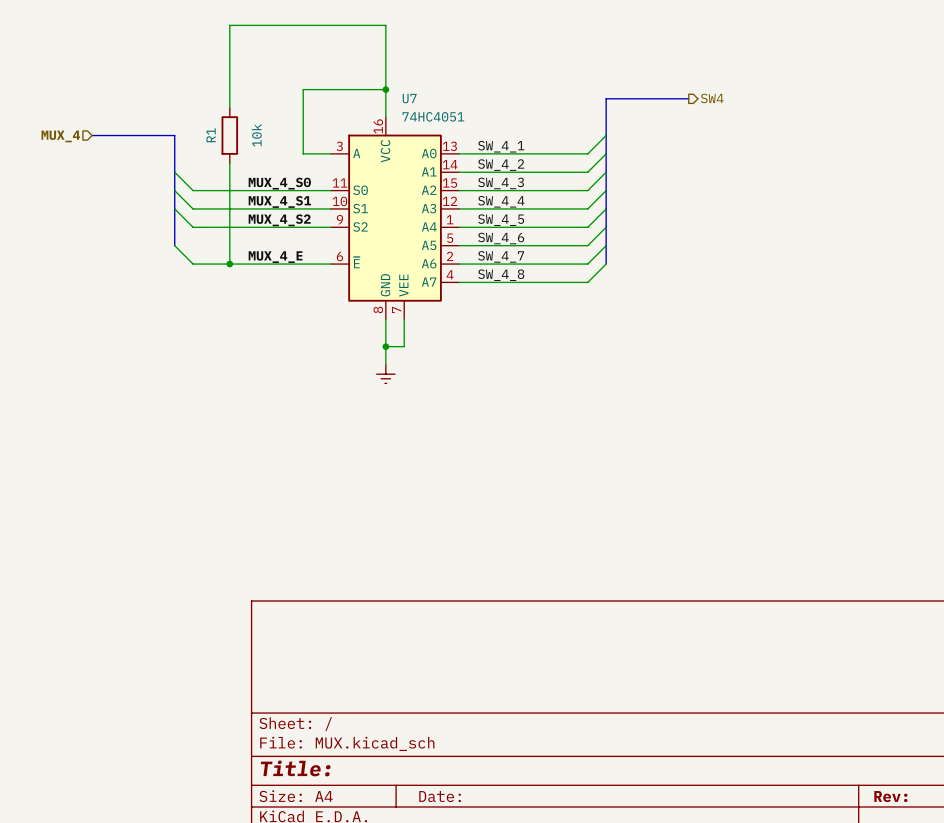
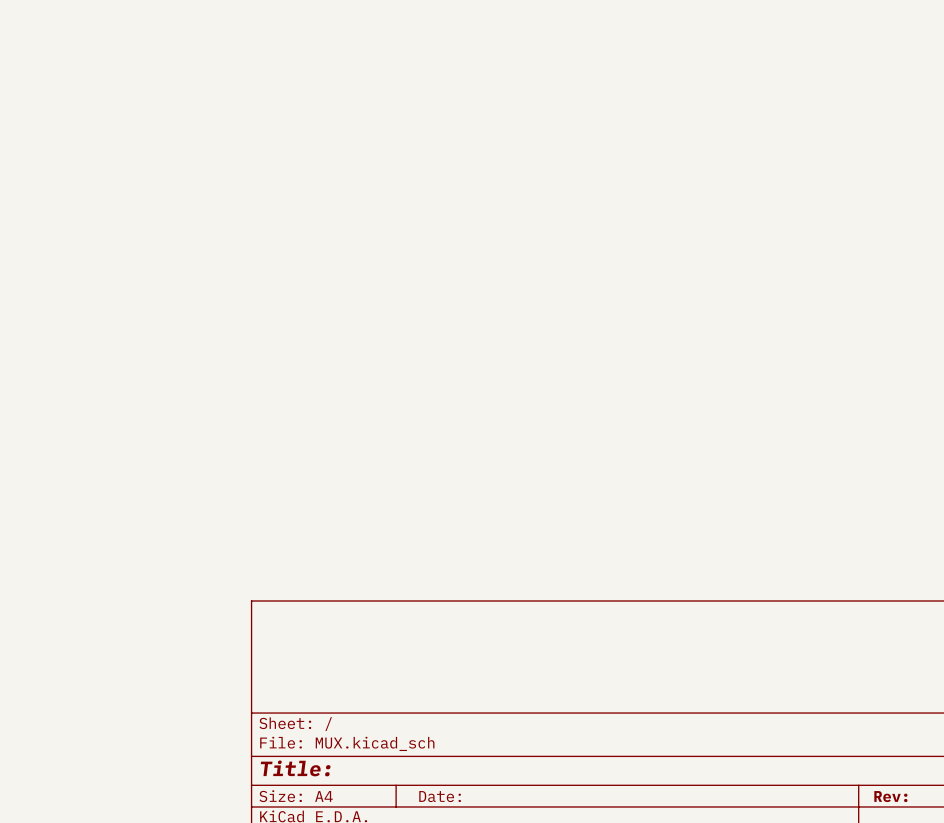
wire: (385, 89) (303, 89) (303, 153) (330, 153) -> none
junction: (385, 89) -> none
bus: (688, 98) (606, 98) (606, 264) -> none
hierarchical label: SW4 (712, 98) -> none
wire: (229, 107) (229, 25) (385, 25) (385, 117) -> none
bus: (92, 135) (174, 135) (174, 245) -> none
R1: 10k (229, 135) -> none
wire: (606, 135) (587, 153) (459, 153) -> none
hierarchical label: MUX_4 (60, 136) -> none
label: SW_4_1 (501, 146) -> none
wire: (606, 153) (587, 172) (459, 172) -> none
wire: (229, 163) (229, 264) -> none
label: SW_4_2 (501, 165) -> none
wire: (174, 172) (193, 190) (330, 190) -> none
wire: (606, 172) (587, 190) (459, 190) -> none
label: MUX_4_S0 (279, 183) -> none
label: SW_4_3 (501, 183) -> none
wire: (174, 190) (193, 208) (330, 208) -> none
wire: (606, 190) (587, 208) (459, 208) -> none
label: MUX_4_S1 (279, 201) -> none
label: SW_4_4 (501, 201) -> none
wire: (174, 208) (193, 227) (330, 227) -> none
wire: (606, 208) (587, 227) (459, 227) -> none
U7: 74HC4051 (395, 218) -> none
label: MUX_4_S2 (279, 220) -> none
label: SW_4_5 (501, 220) -> none
wire: (606, 227) (587, 245) (459, 245) -> none
label: SW_4_6 (501, 238) -> none
wire: (174, 245) (193, 264) (330, 264) -> none
wire: (606, 245) (587, 264) (459, 264) -> none
label: SW_4_7 (501, 256) -> none
label: MUX_4_E (275, 257) -> none
junction: (229, 264) -> none
wire: (606, 264) (587, 282) (459, 282) -> none
label: SW_4_8 (501, 275) -> none
wire: (385, 319) (385, 365) -> none
wire: (404, 319) (404, 346) (385, 346) -> none
junction: (385, 346) -> none
power symbol: (385, 374) -> none

